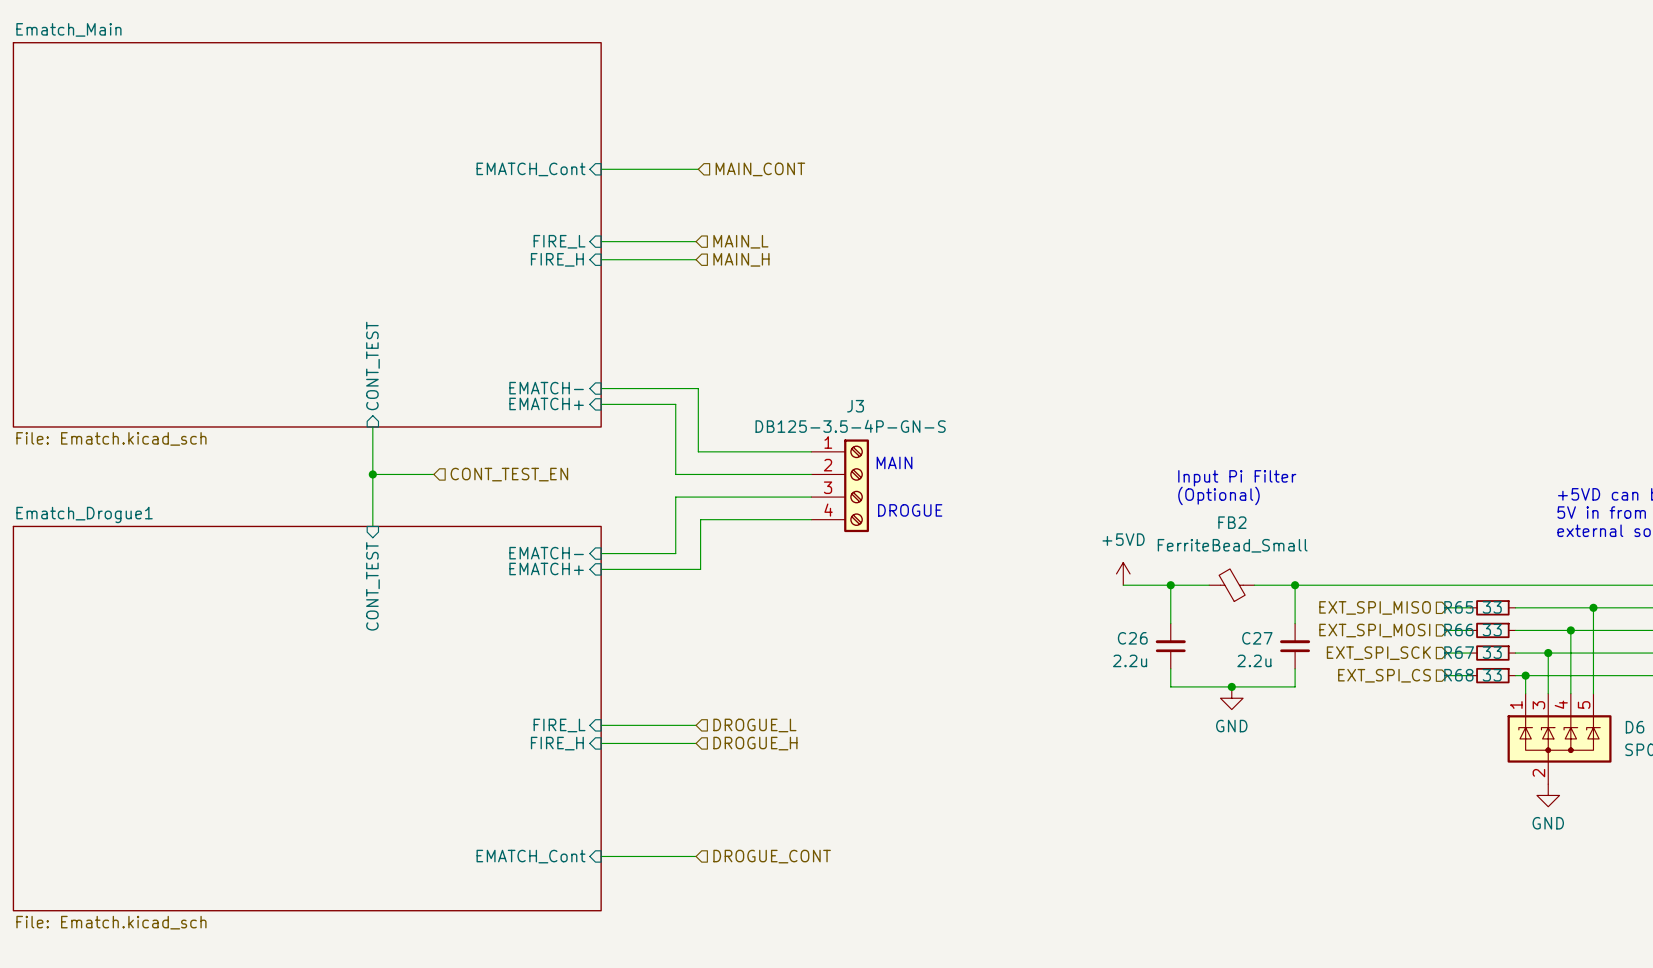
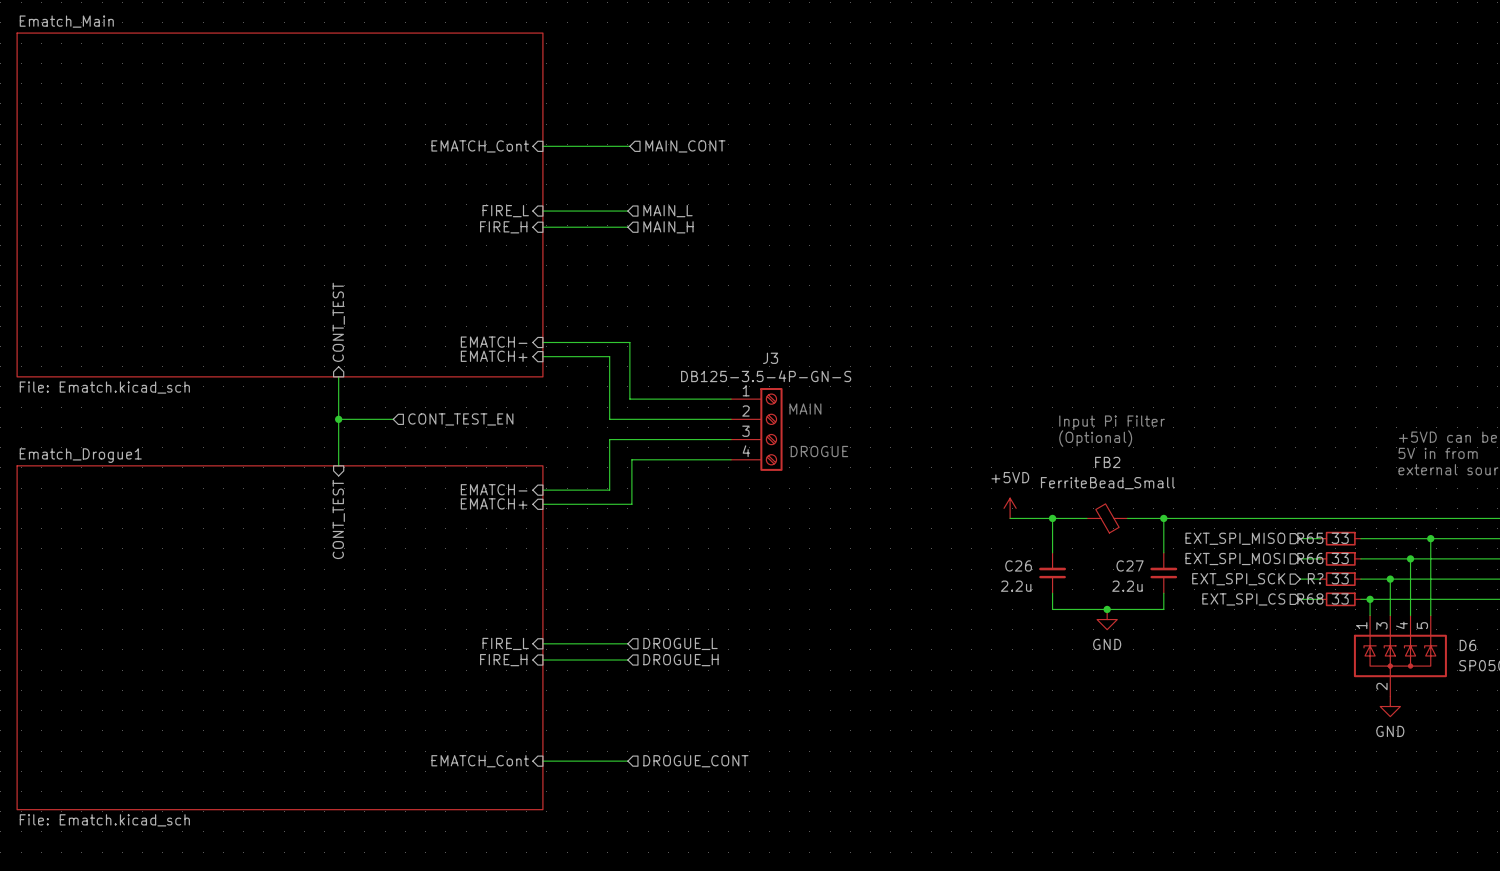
R67 name: R67 (1459, 652) -> R? (1315, 578)

